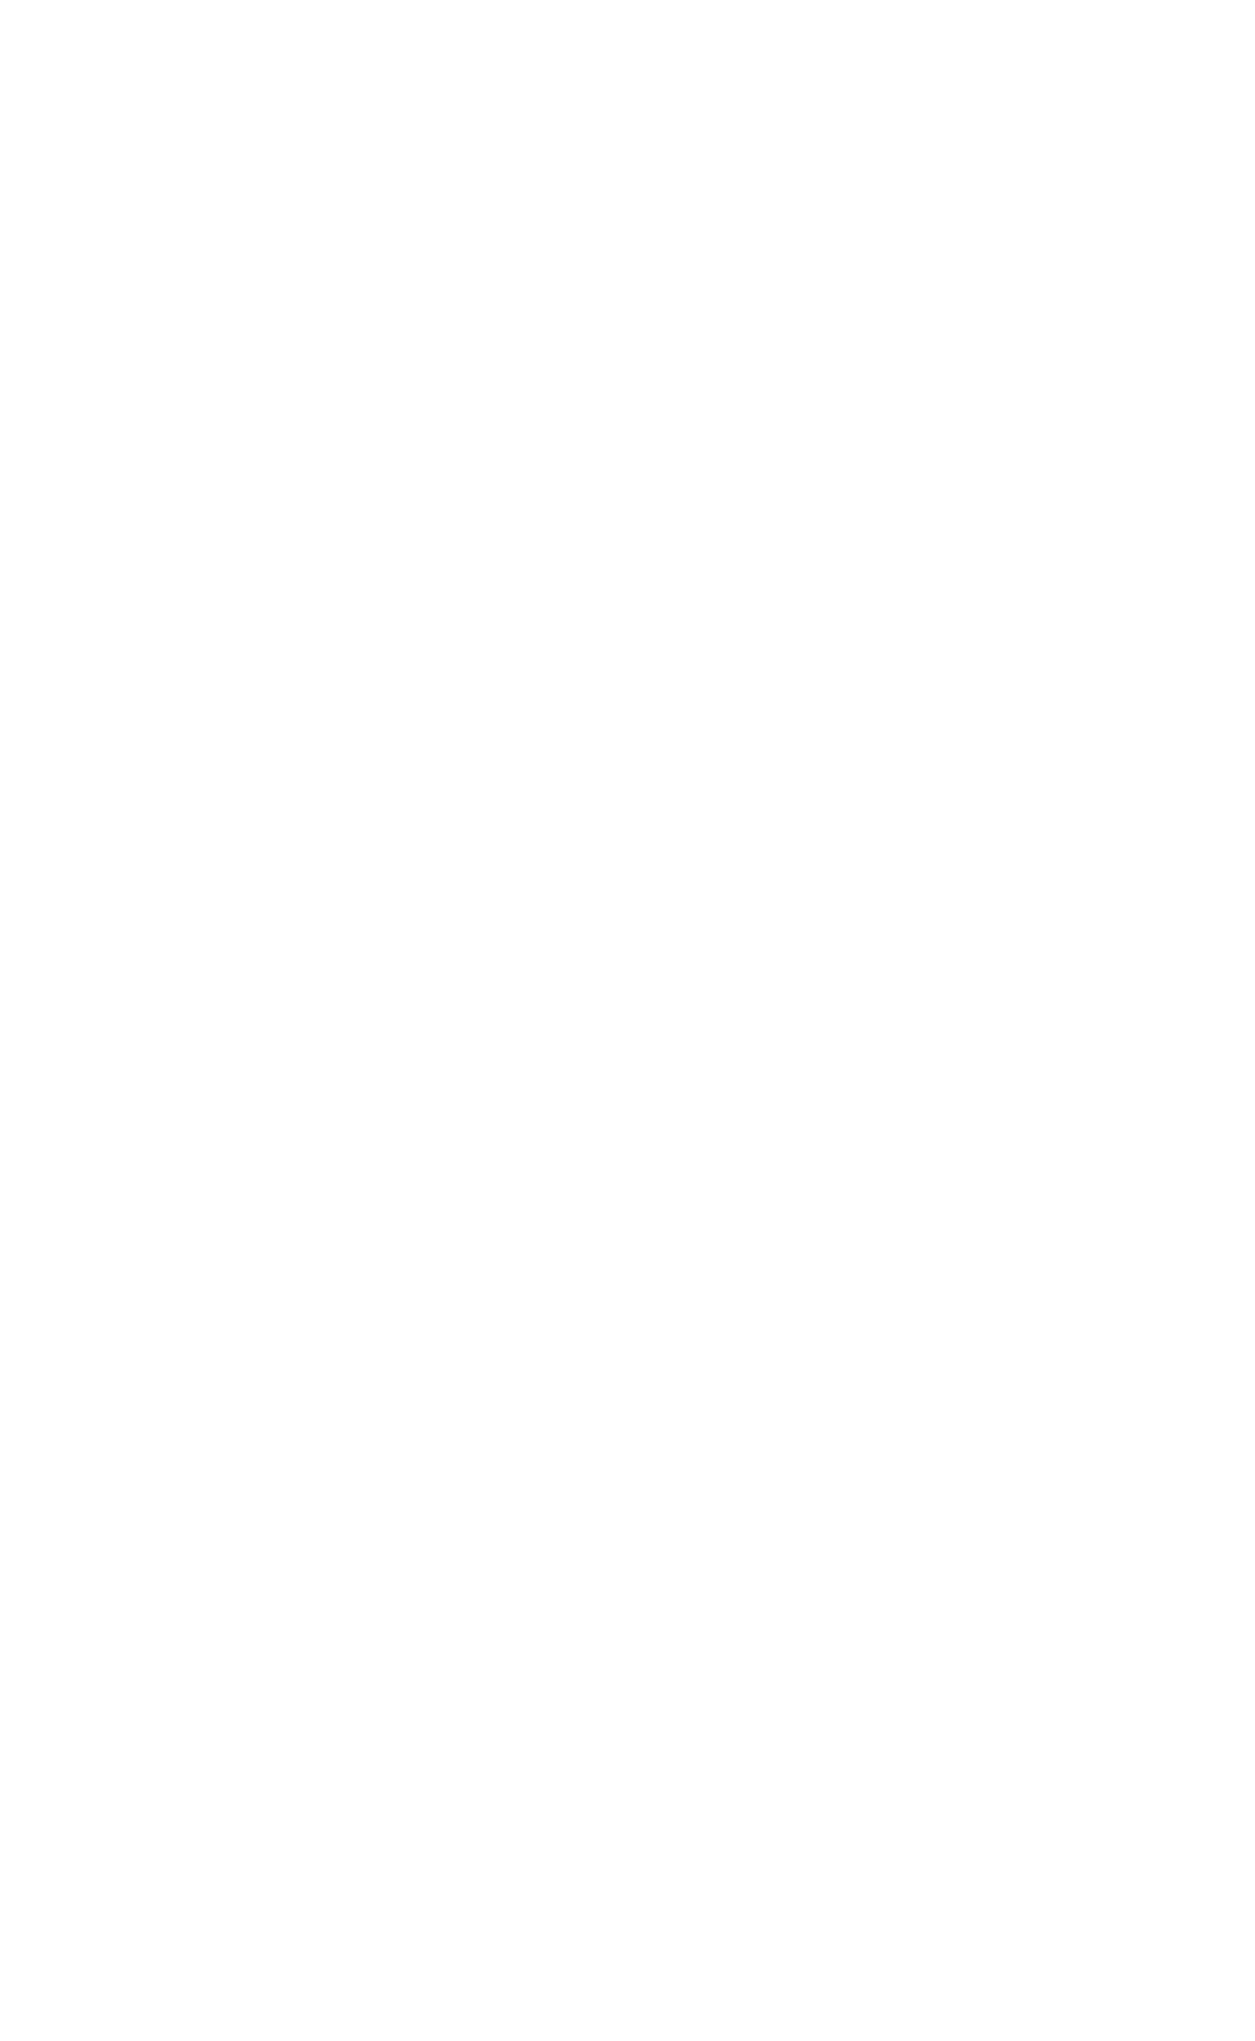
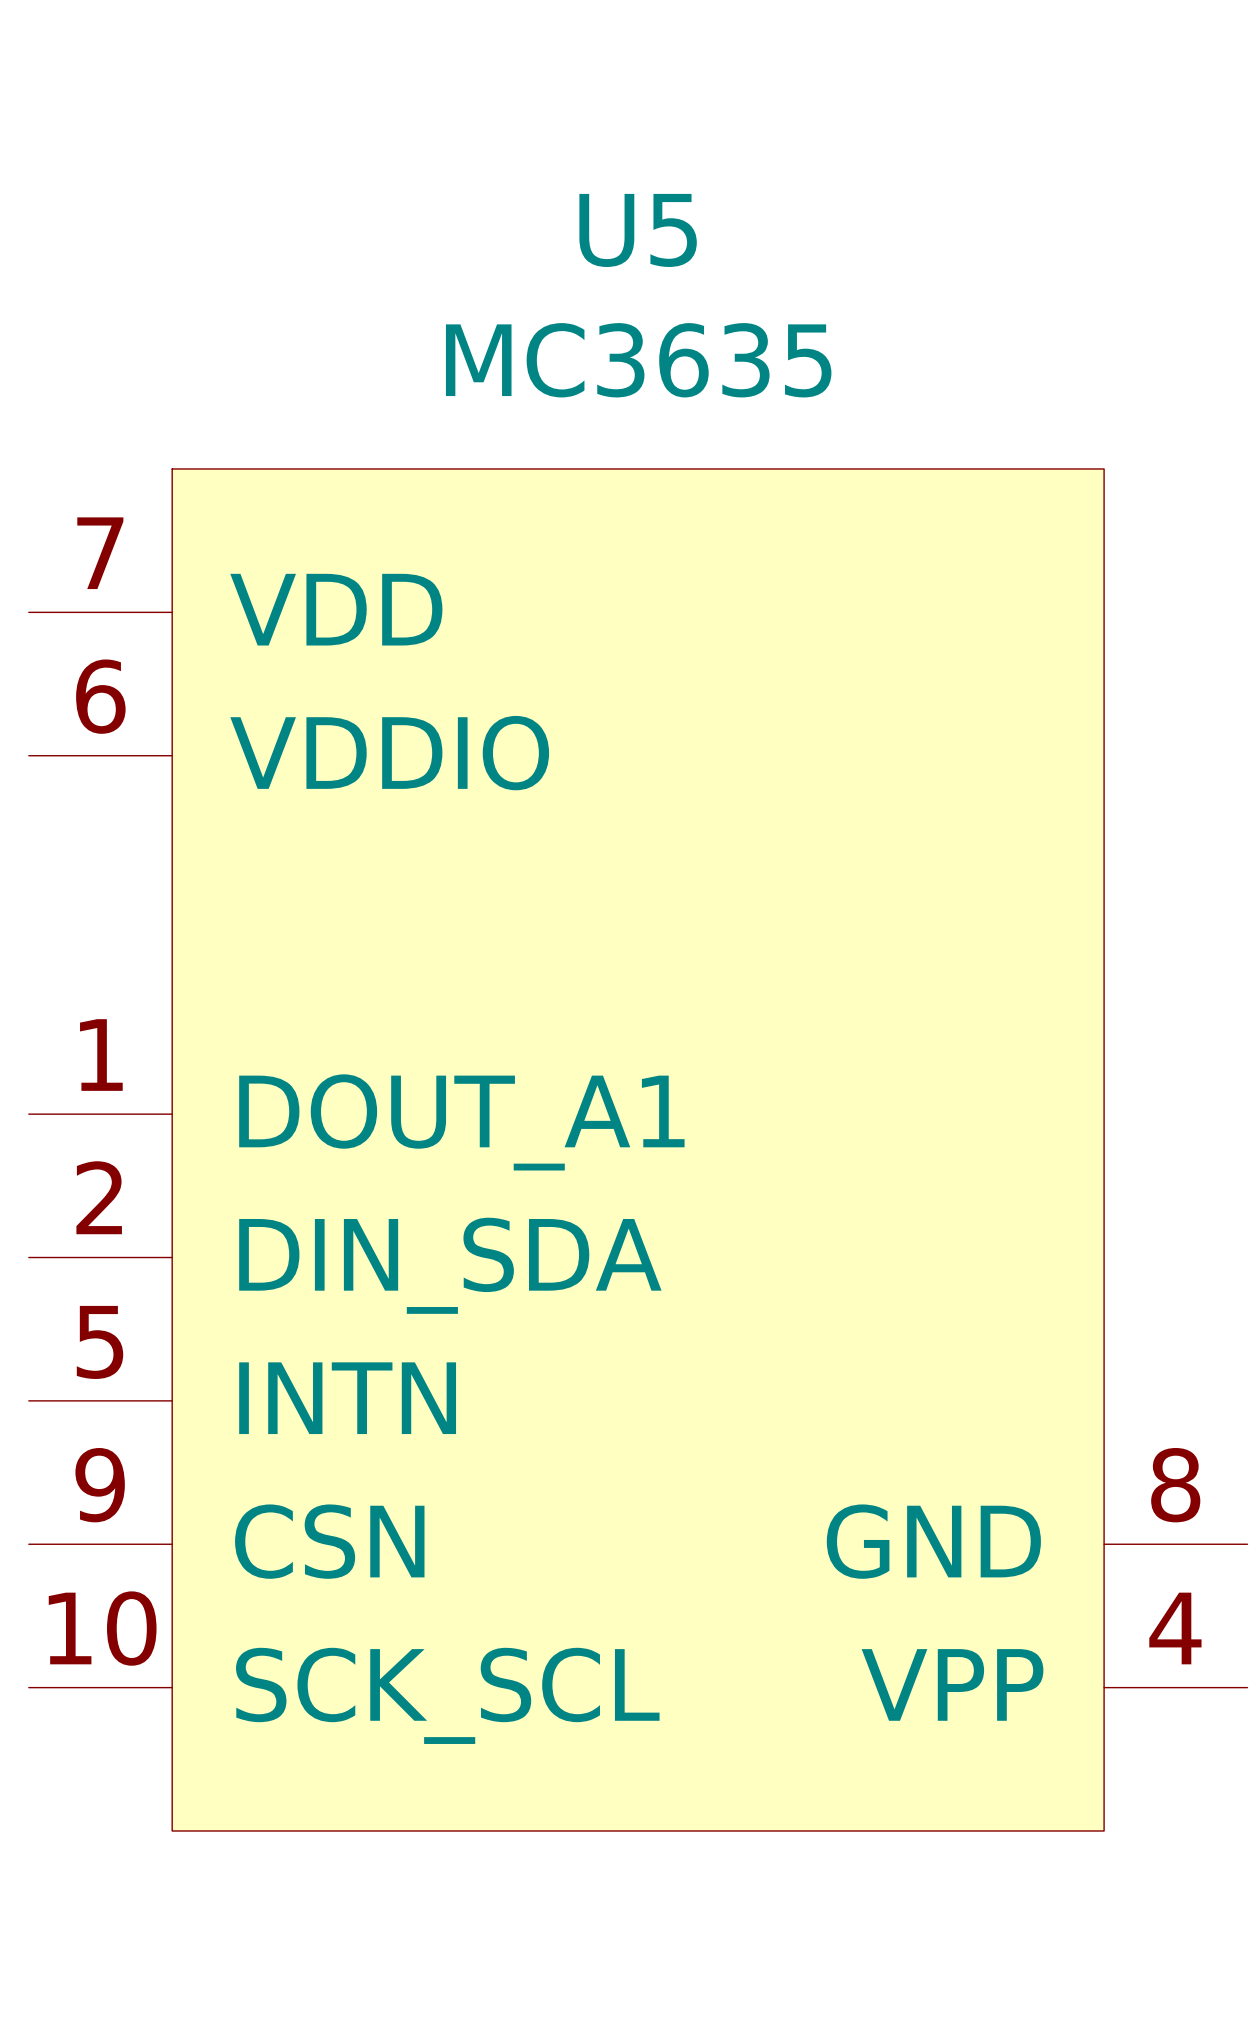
U5: none -> MC3635 (638, 1149)

